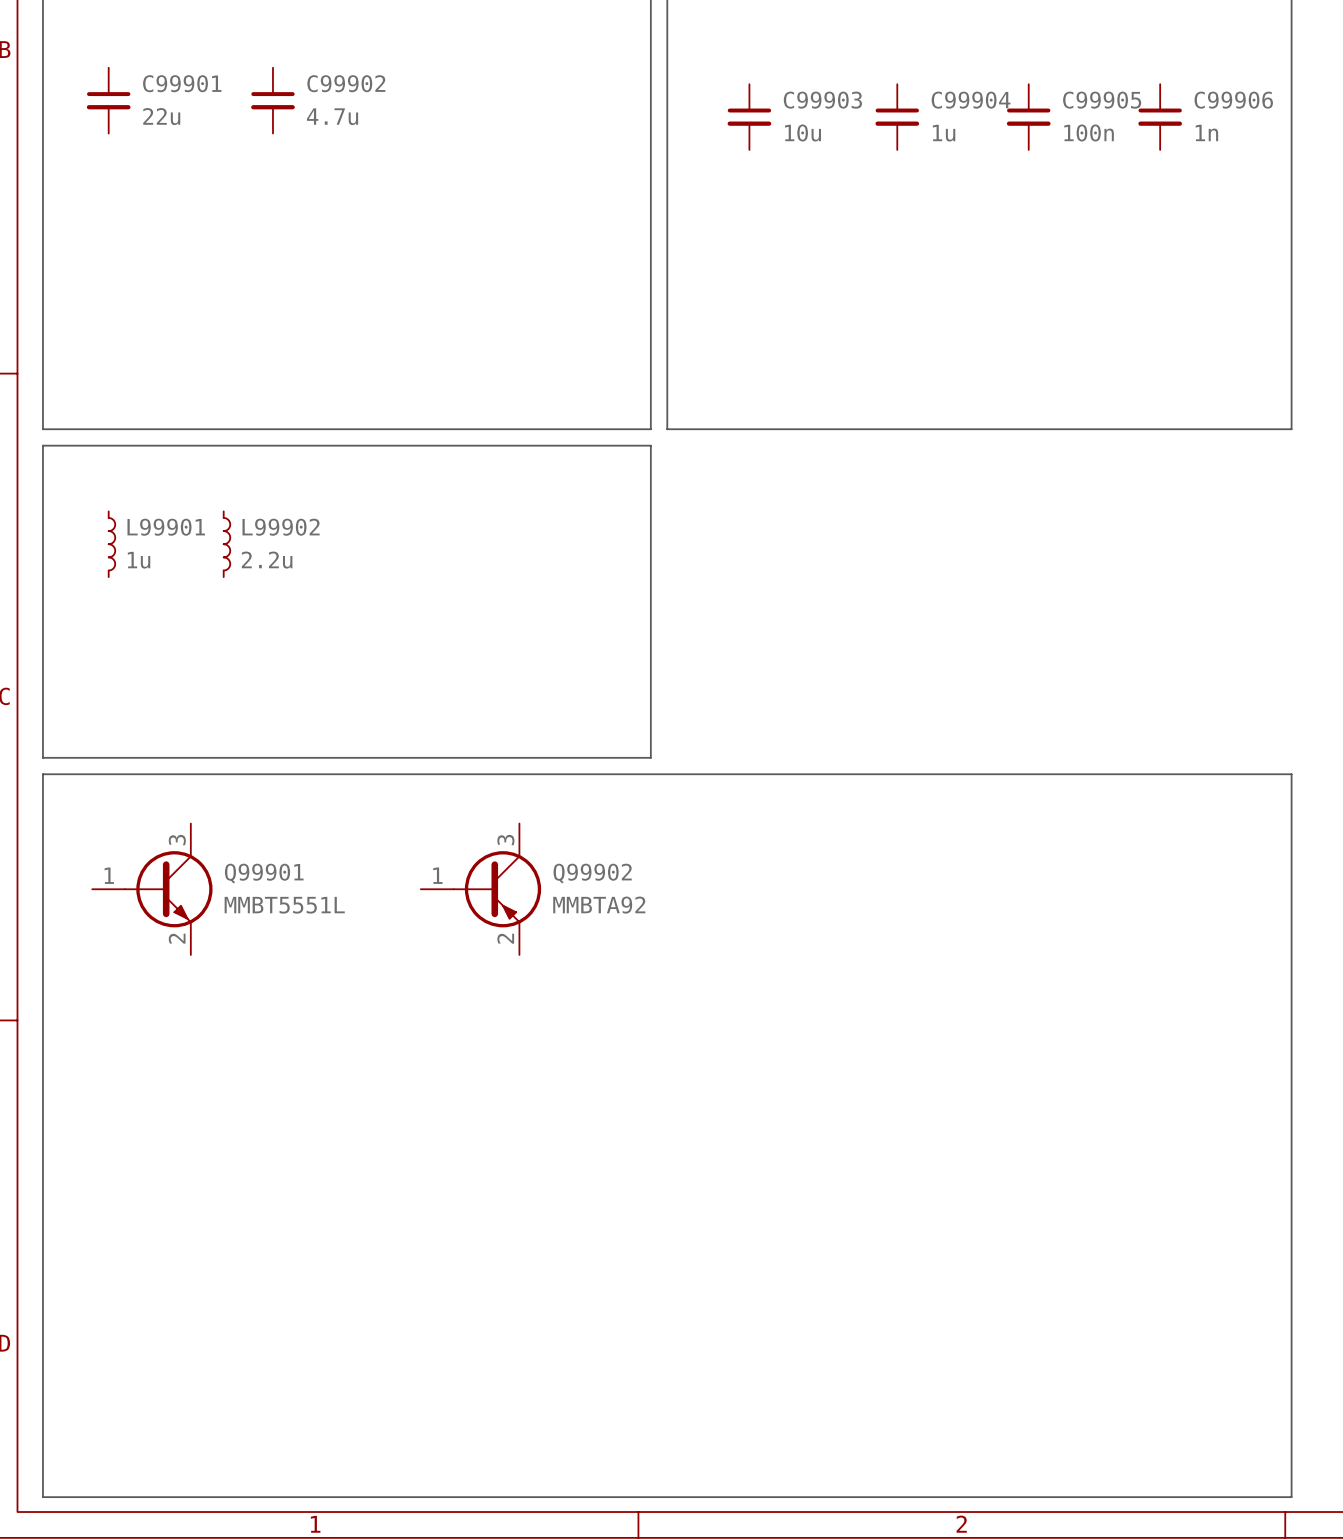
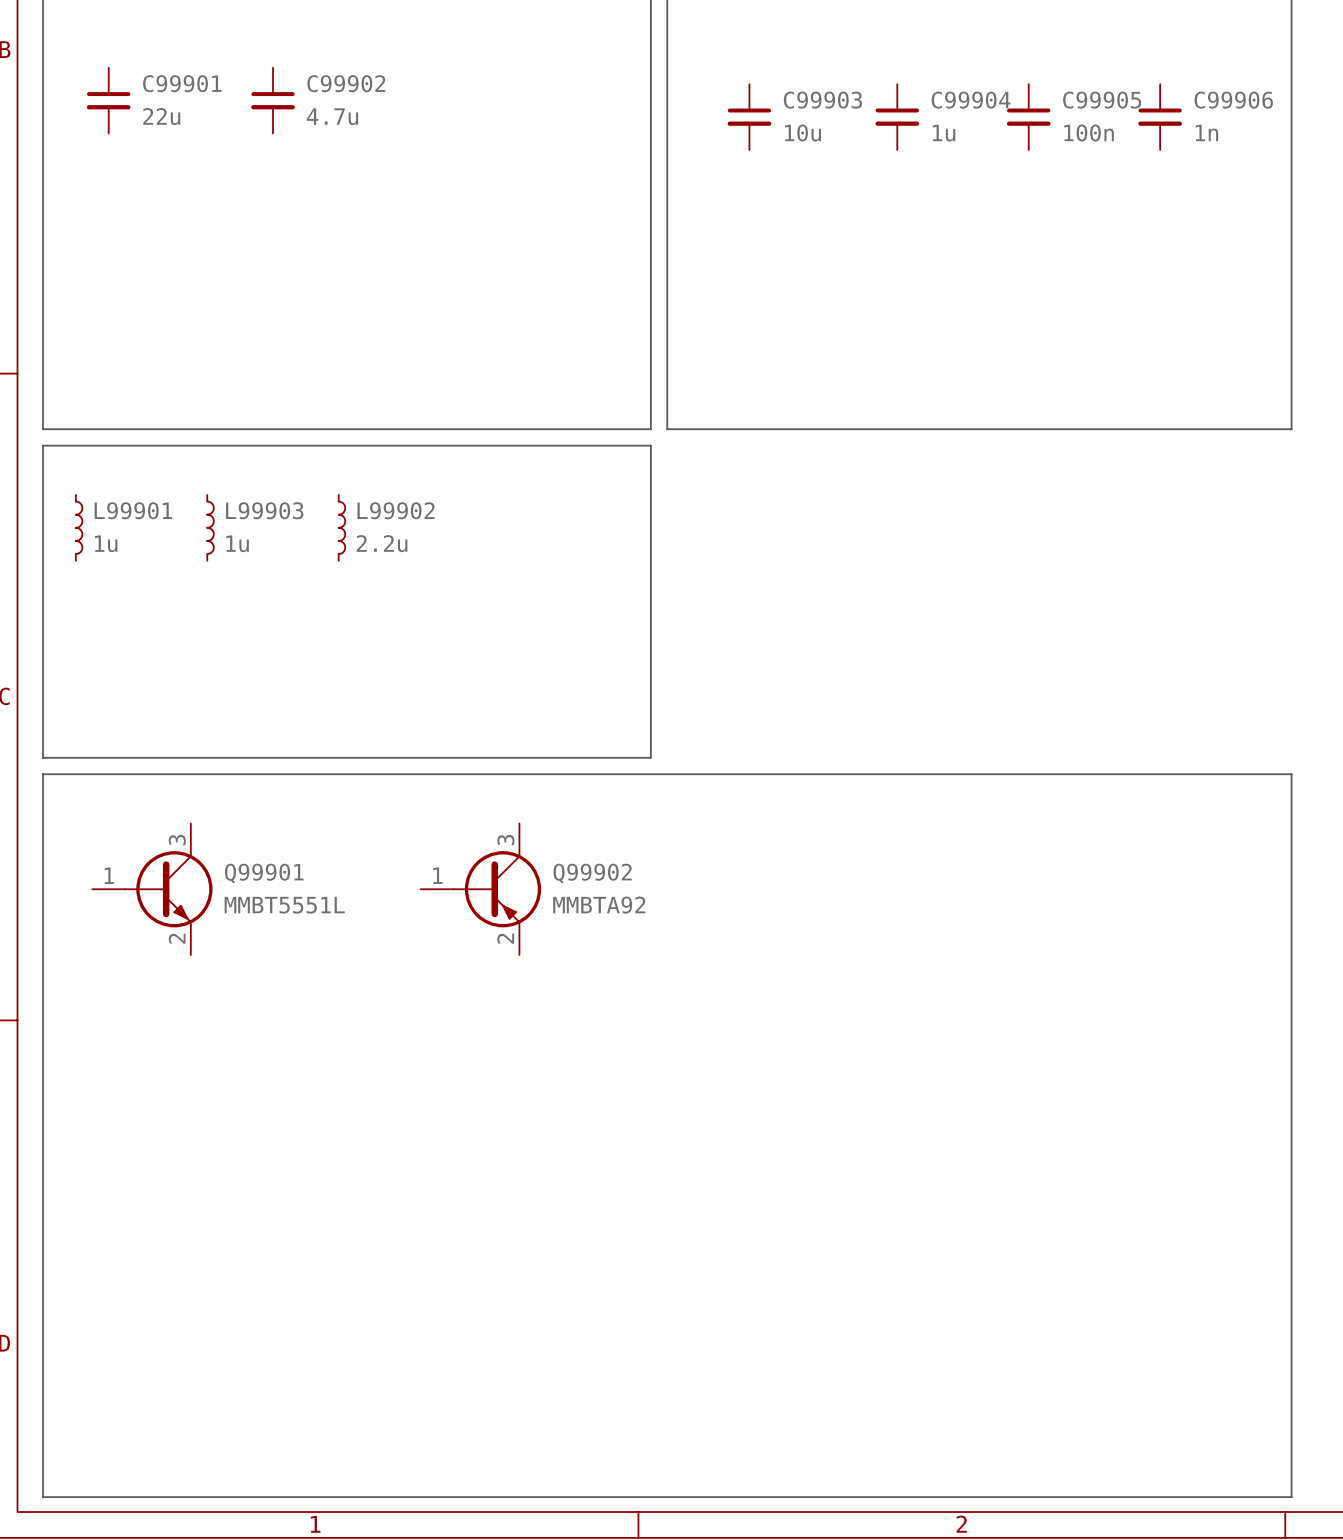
L99903: none -> 1u (210, 527)
L99901 position: (111, 544) -> (79, 527)
L99902 position: (226, 544) -> (341, 527)

